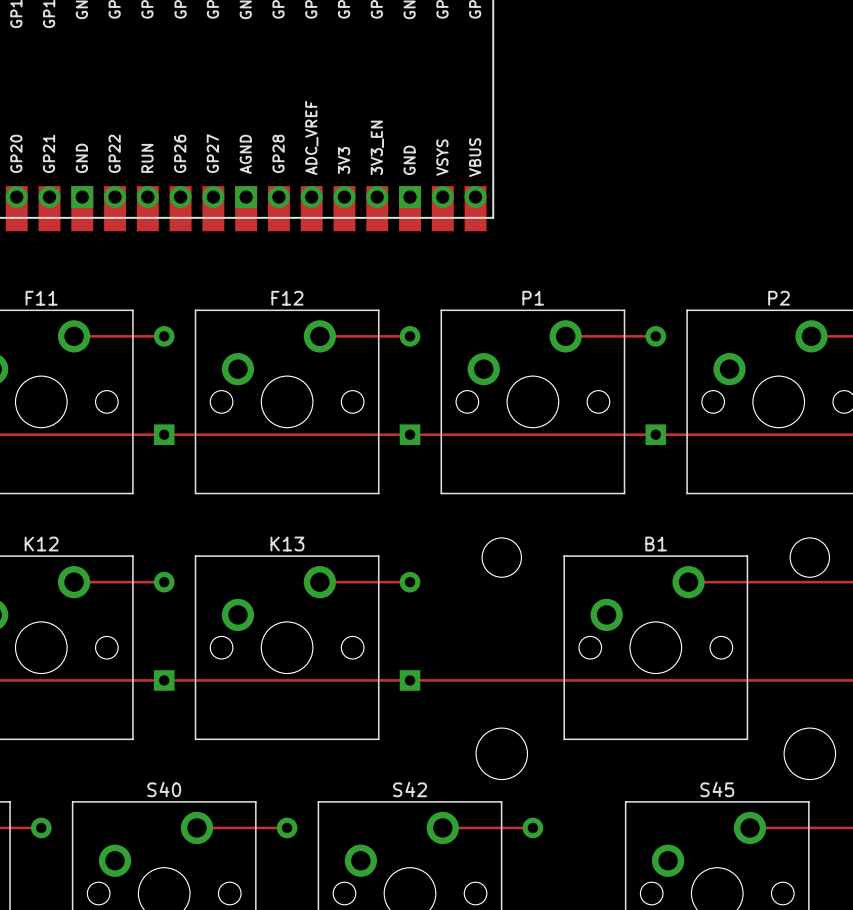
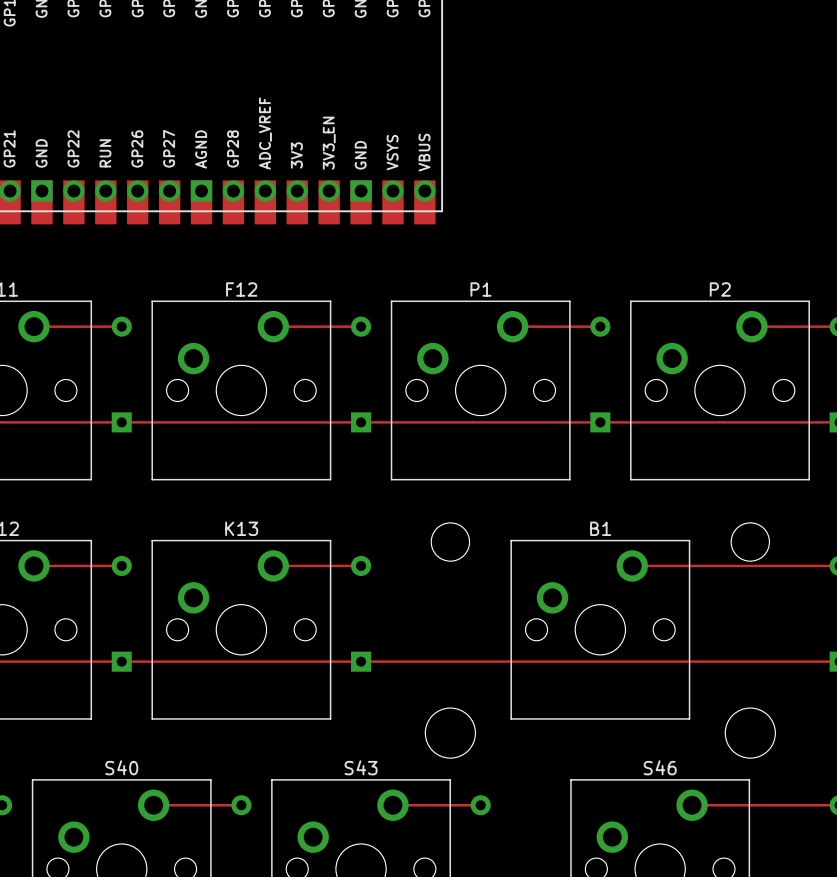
S42 name: S42 (410, 789) -> S43 (361, 767)
S45 name: S45 (717, 789) -> S46 (660, 767)

